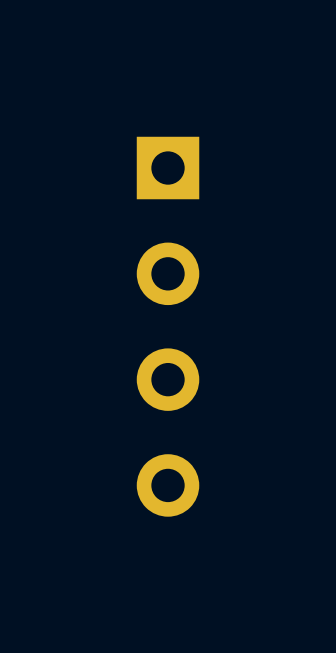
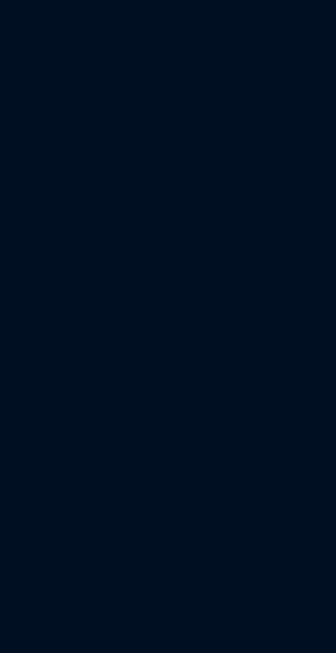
part: (168, 326) -> none

